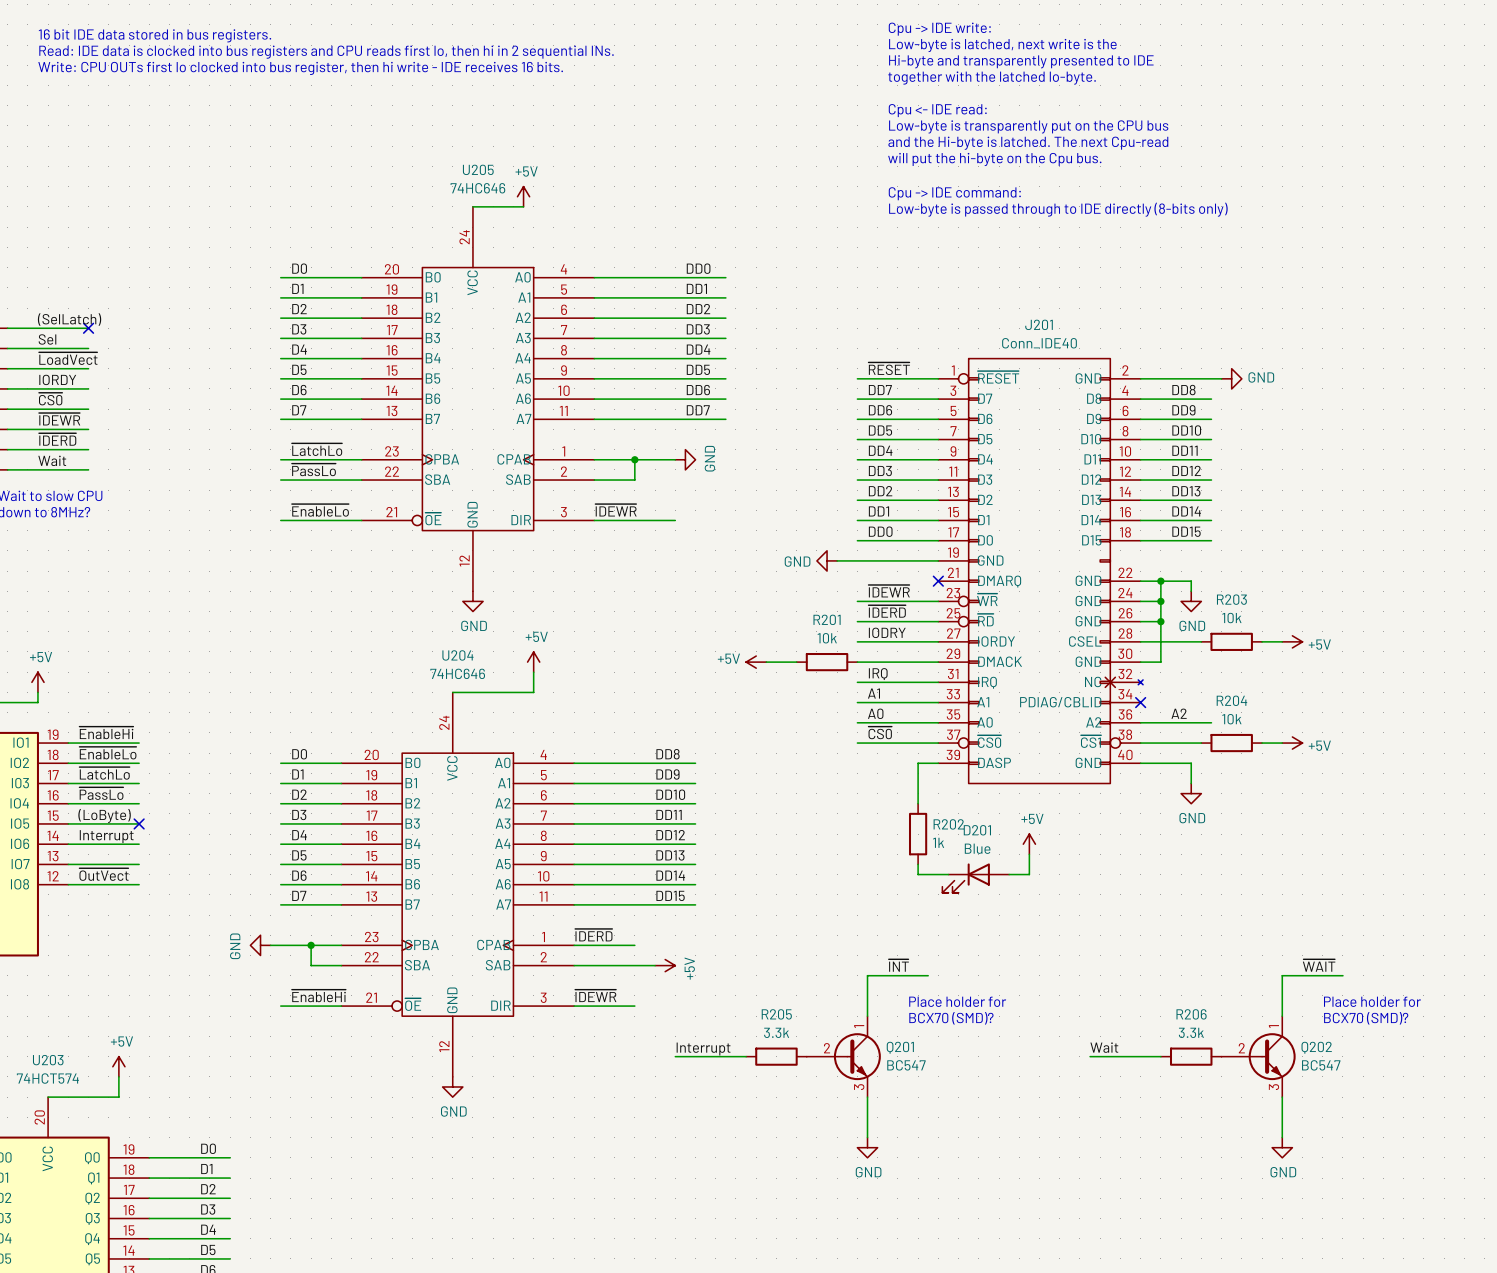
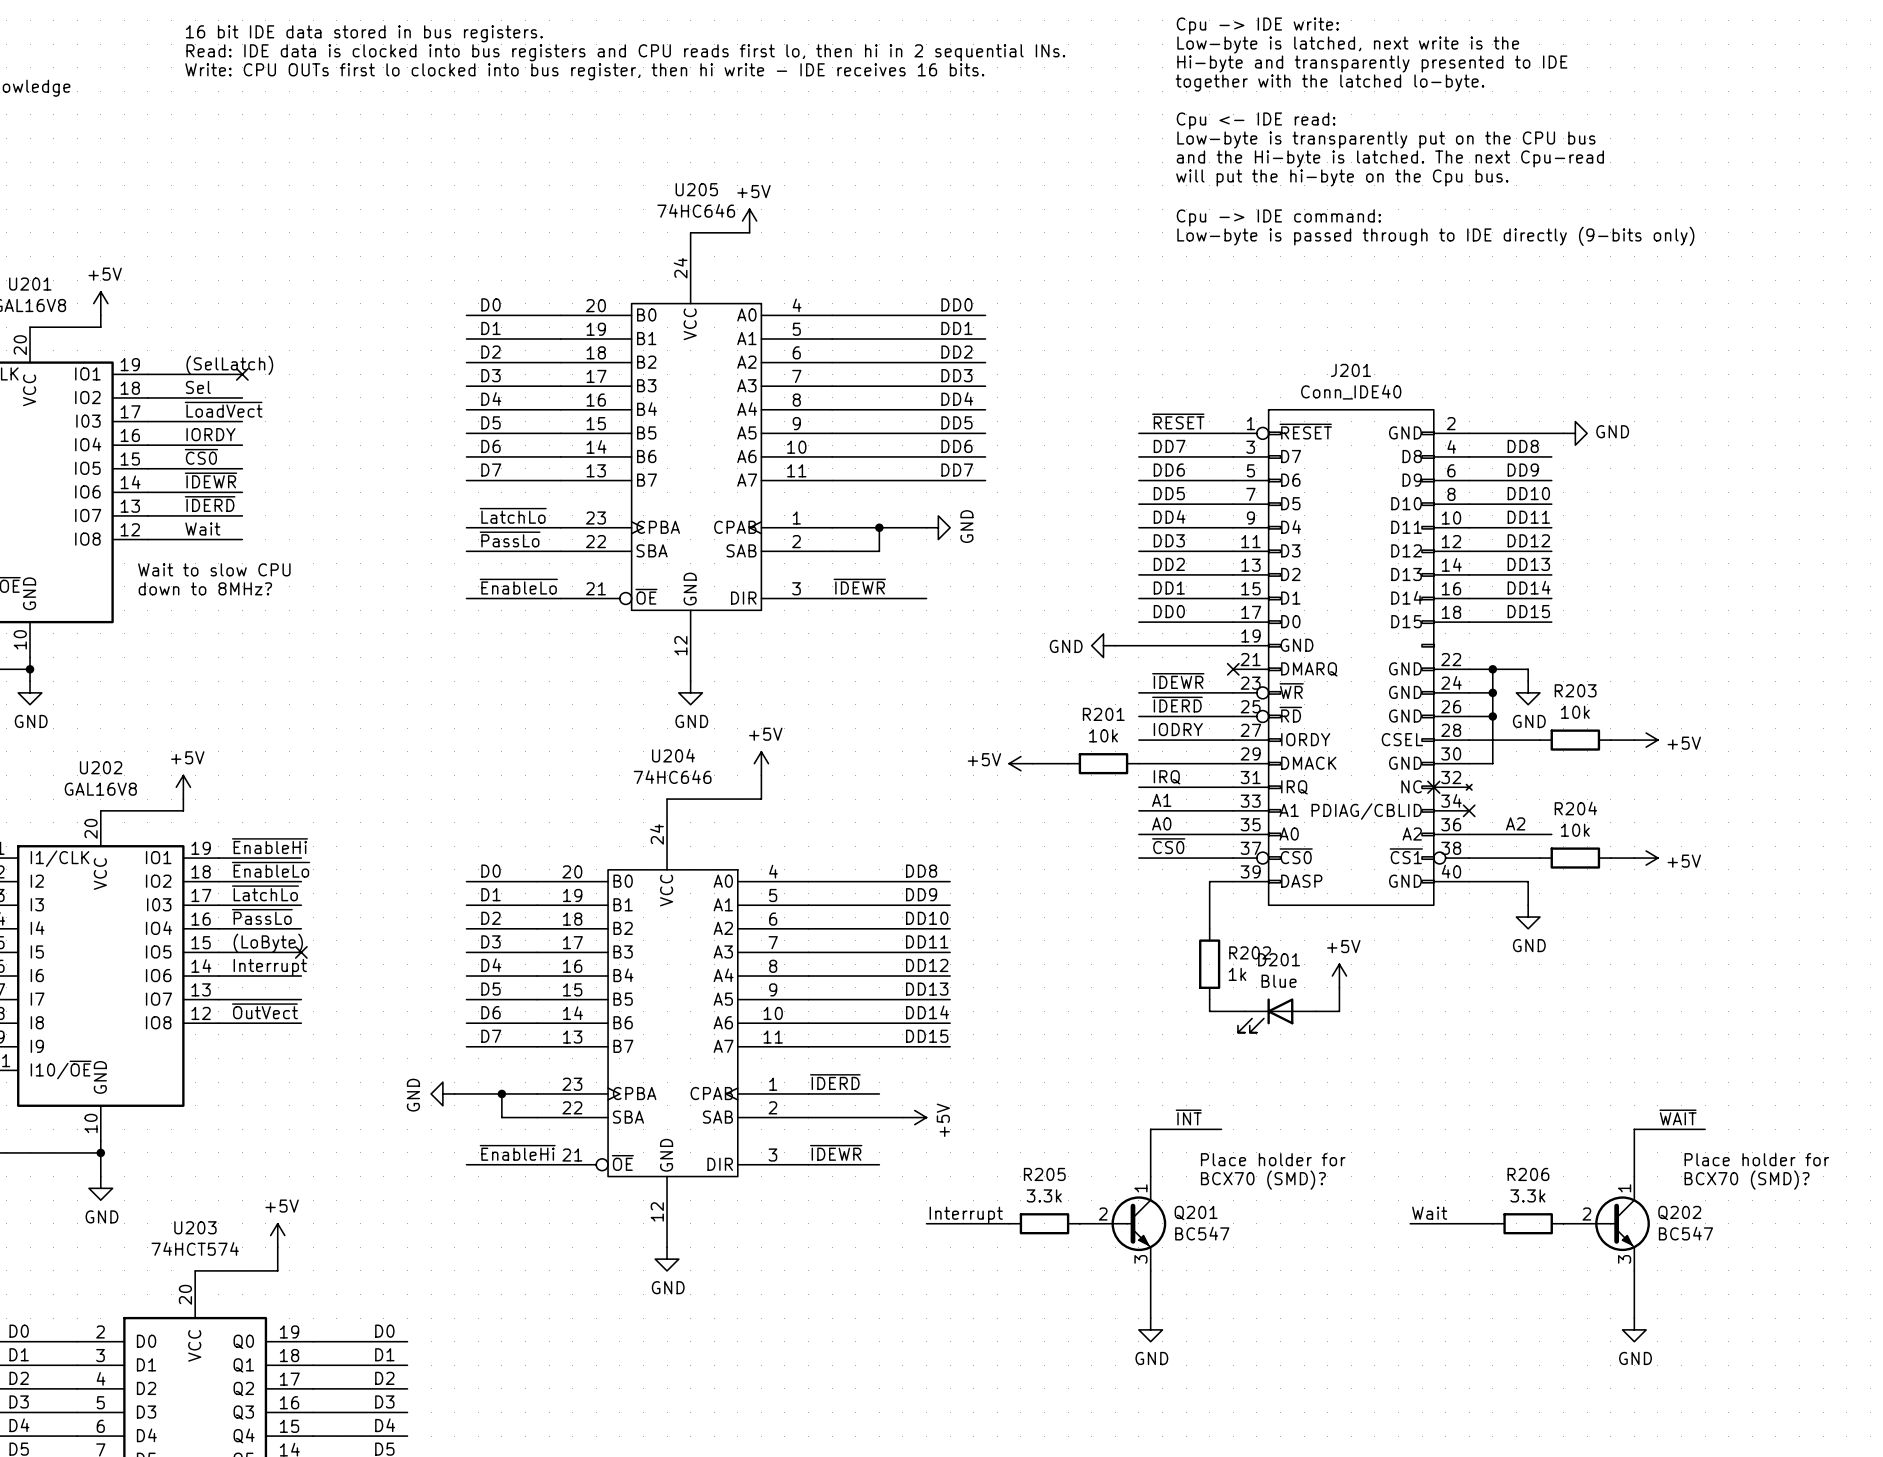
text: Low-byte is passed through to IDE directly (8-bits only) (1058, 209) -> Low-byte is passed through to IDE directly (9-bits only) (1435, 236)

